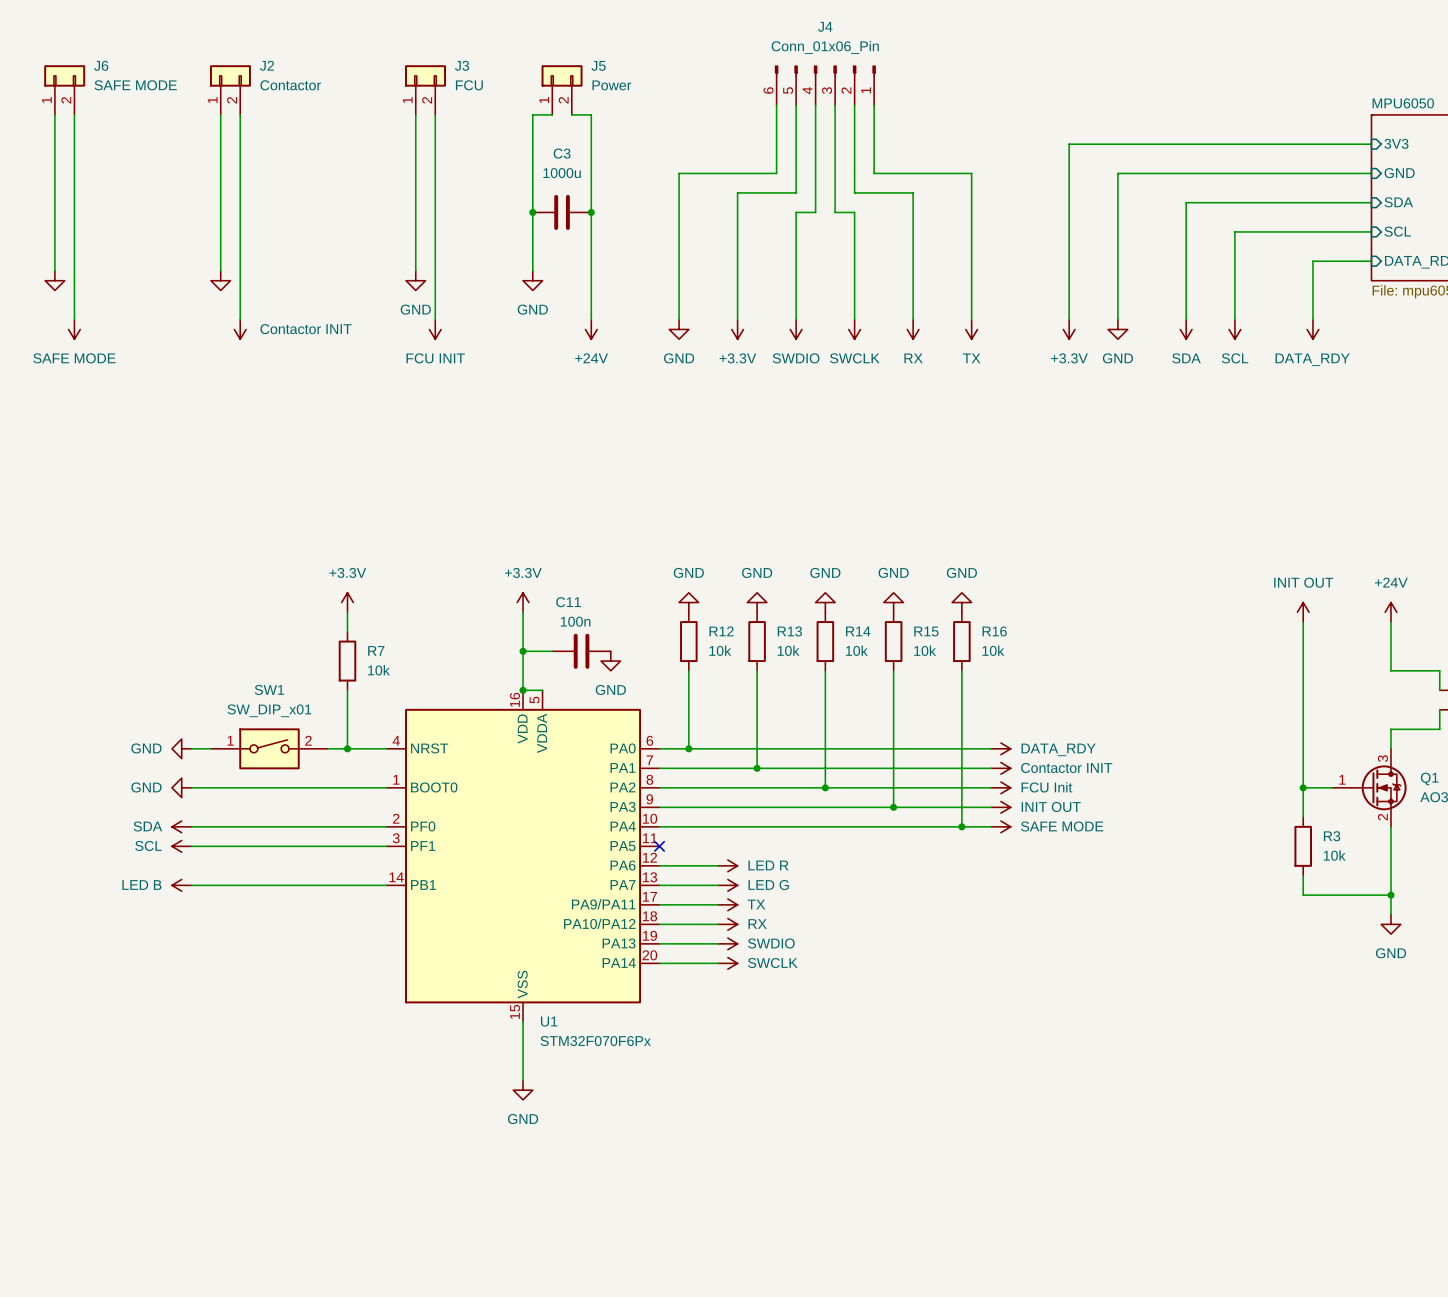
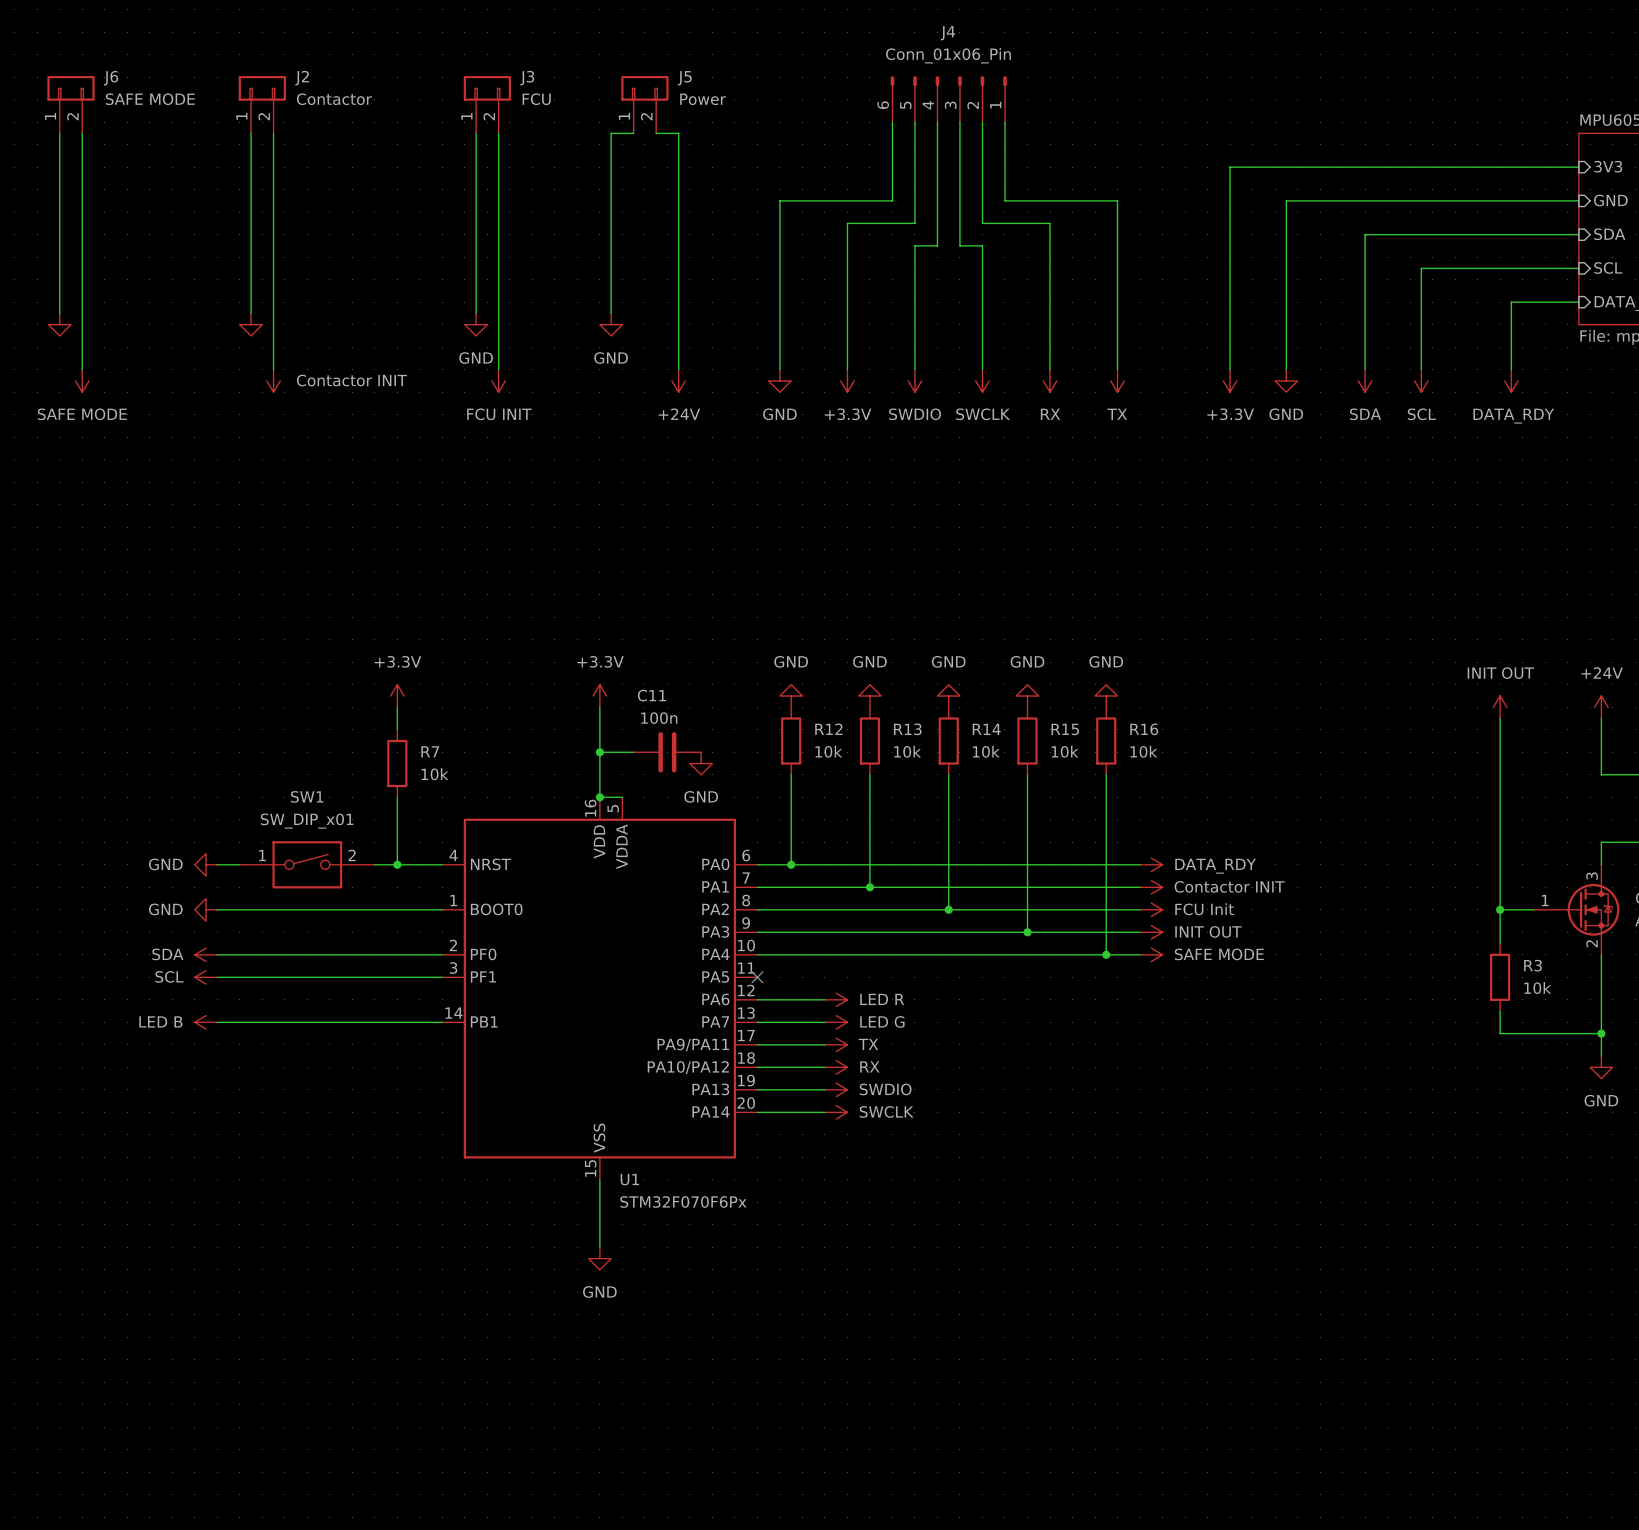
junction: (532, 212) -> none
C3: 1000u (562, 212) -> none
junction: (591, 212) -> none

